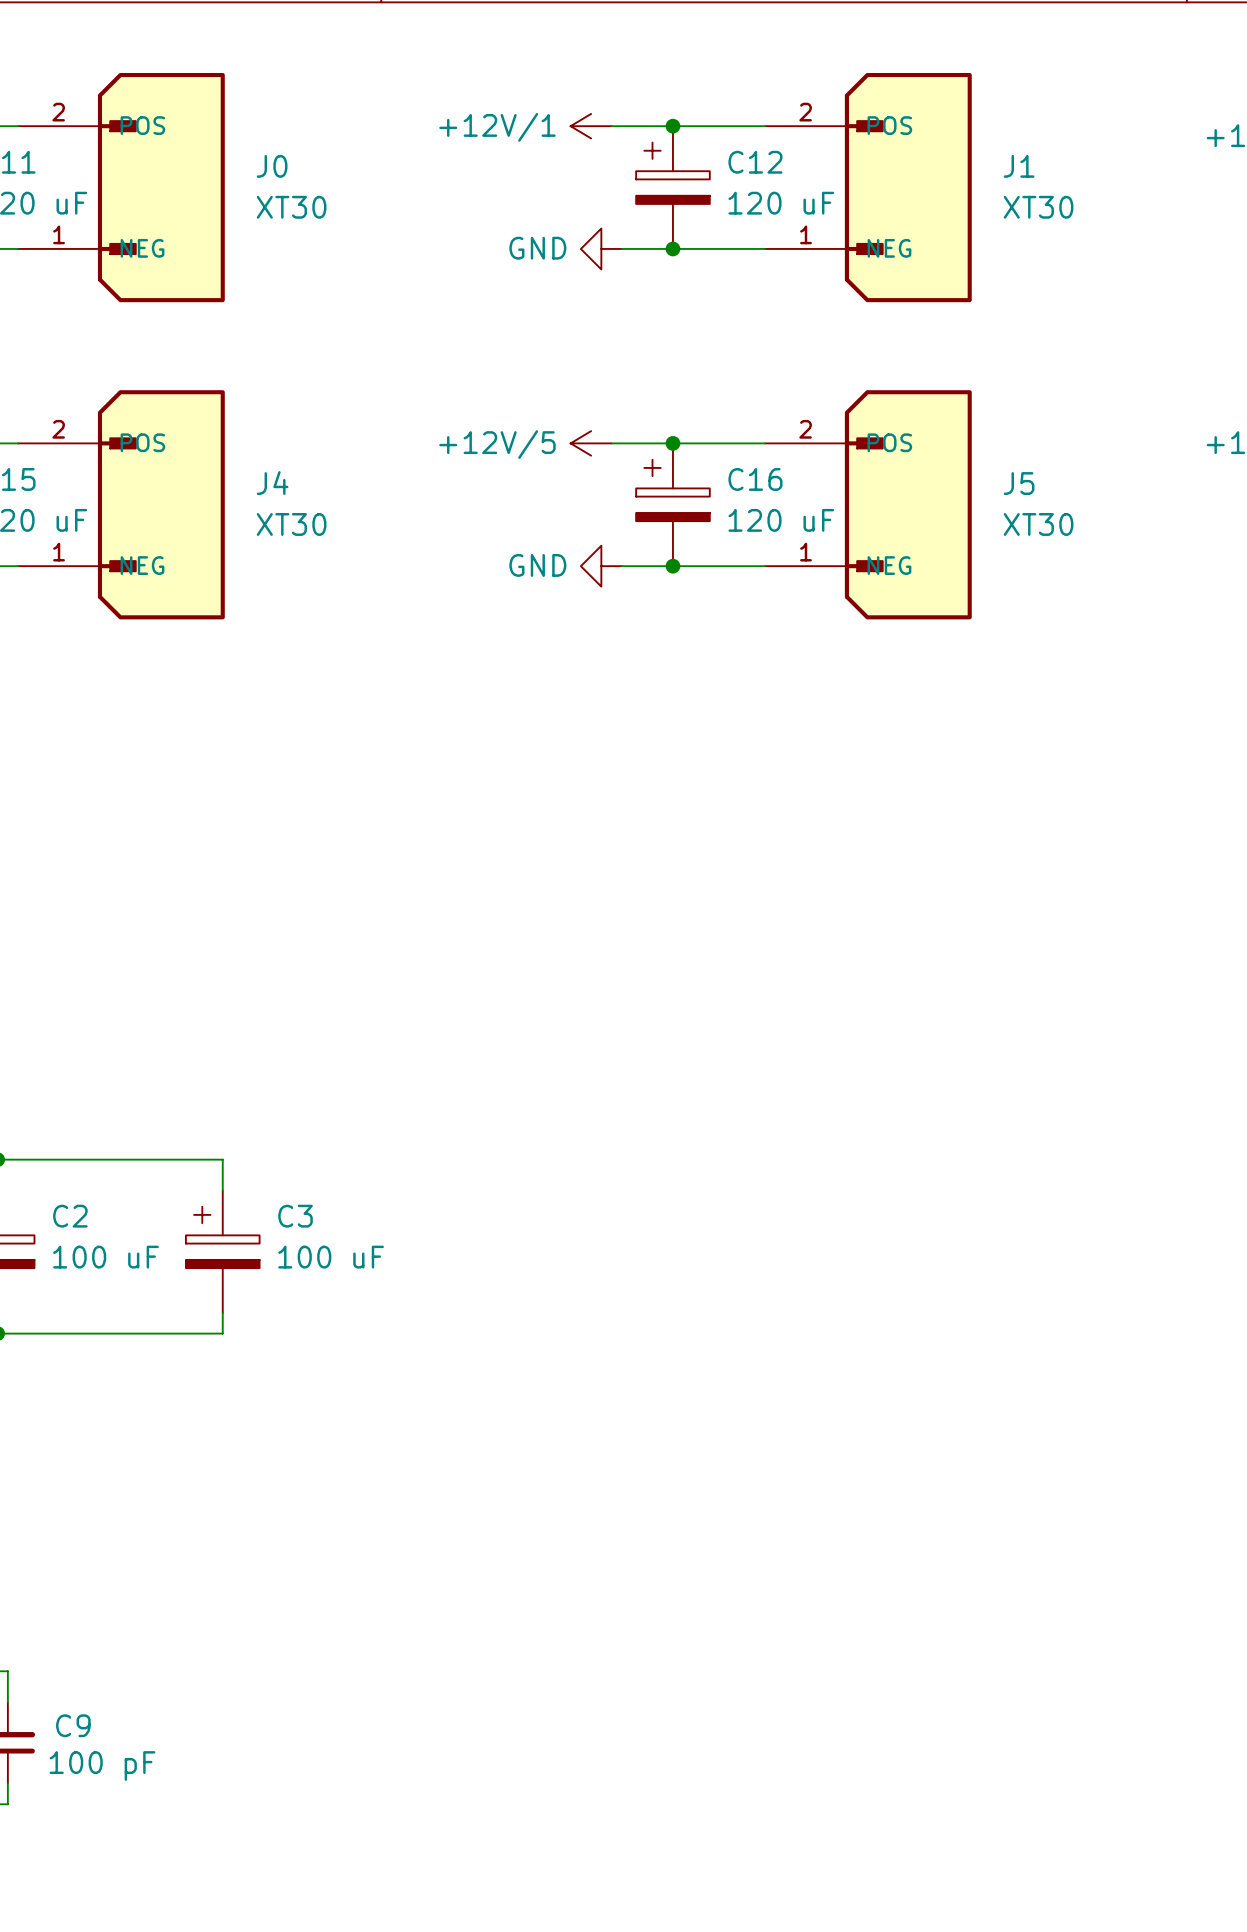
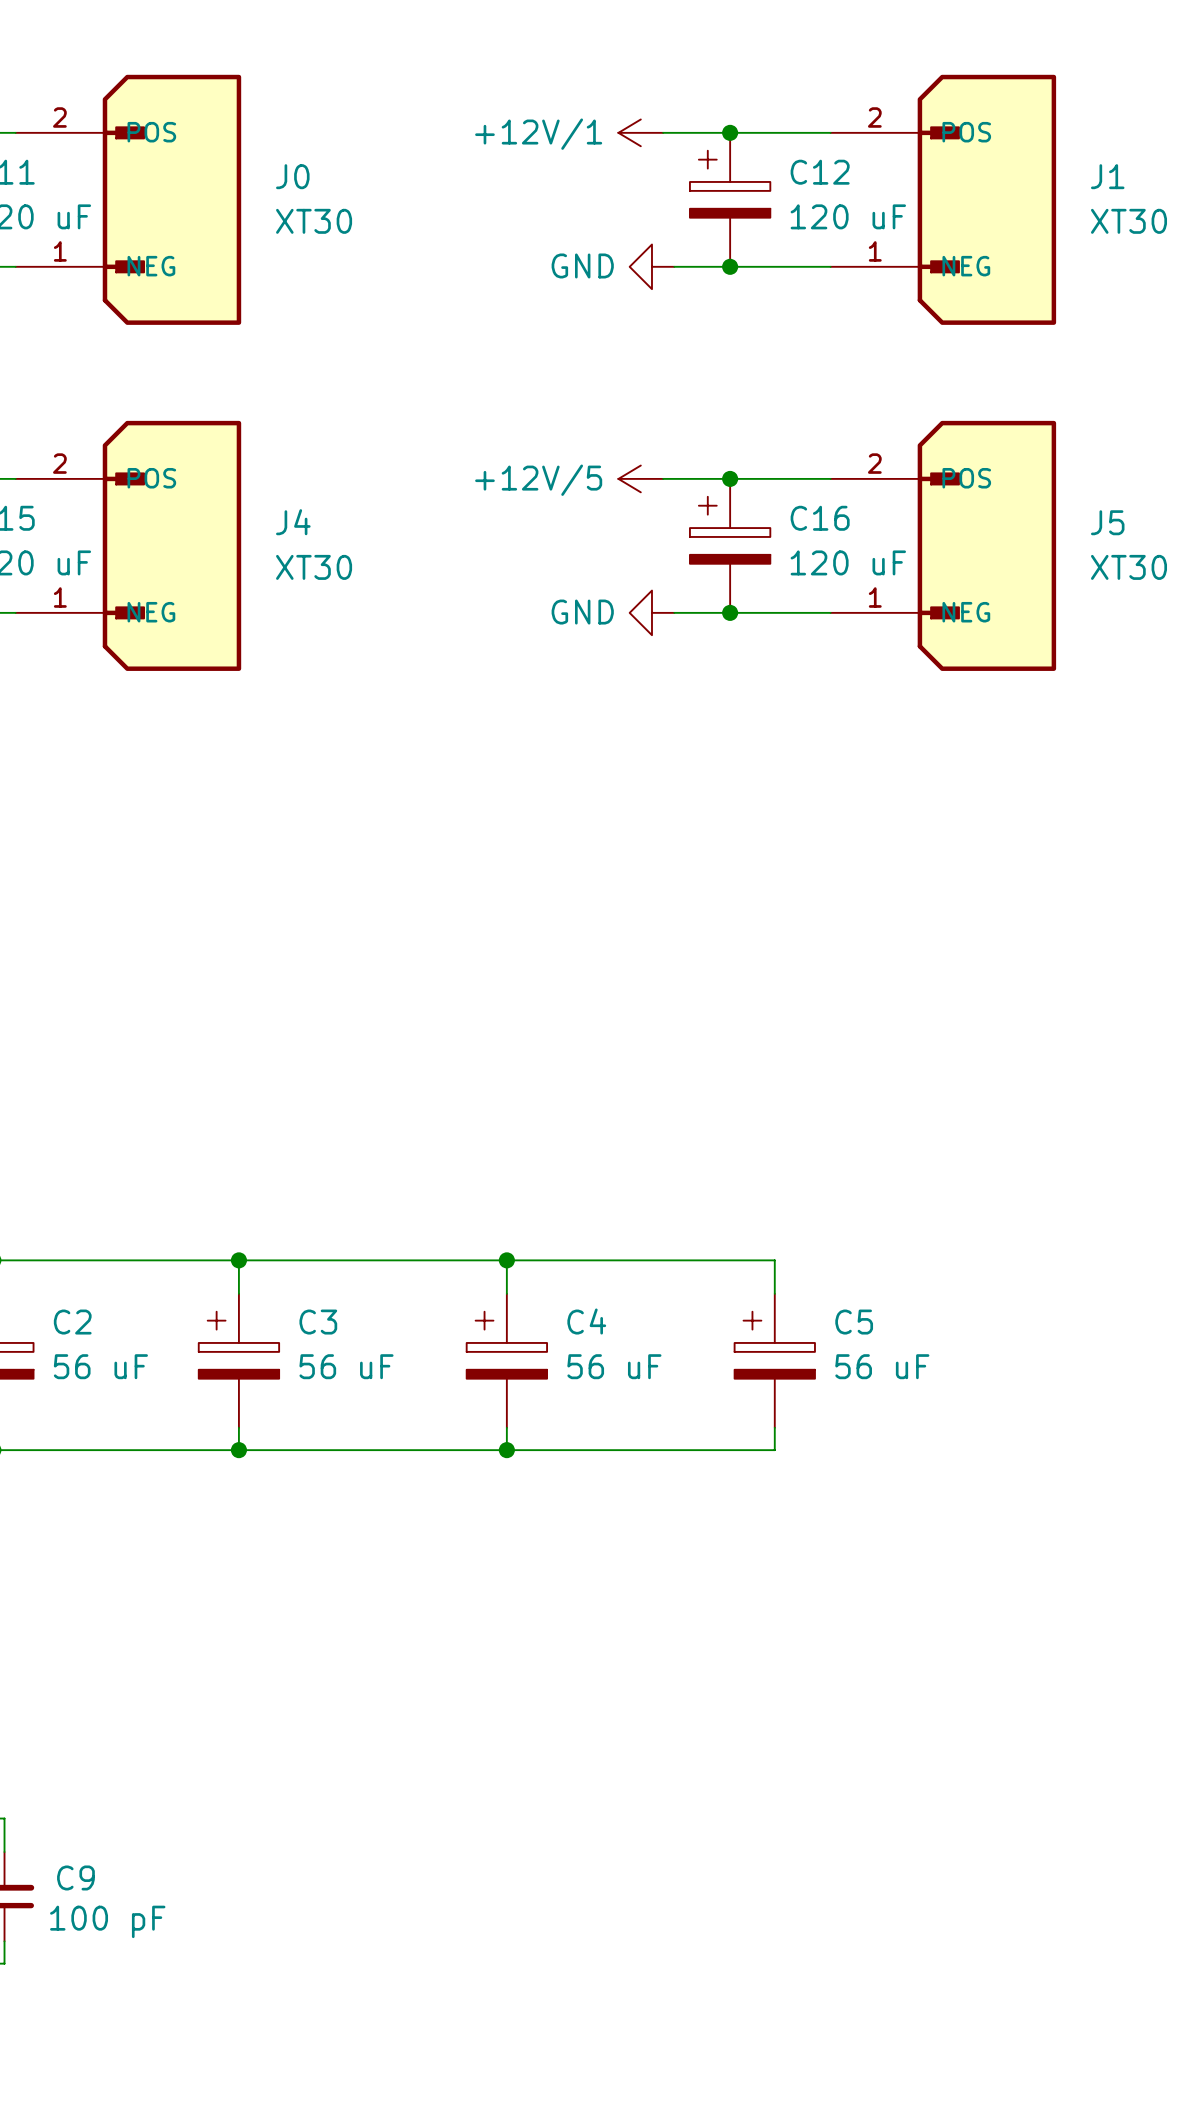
wire: none -> (238, 1260) (774, 1260) (774, 1293)
junction: none -> (238, 1260)
wire: none -> (506, 1260) (506, 1293)
junction: none -> (506, 1260)
C4: none -> 56 uF (506, 1360)
C5: none -> 56 uF (774, 1360)
C2 value: 100 uF (105, 1257) -> 56 uF (100, 1366)
C3 value: 100 uF (331, 1257) -> 56 uF (346, 1366)
wire: none -> (506, 1427) (506, 1450)
wire: none -> (774, 1427) (774, 1450) (238, 1450)
junction: none -> (238, 1450)
junction: none -> (506, 1450)

